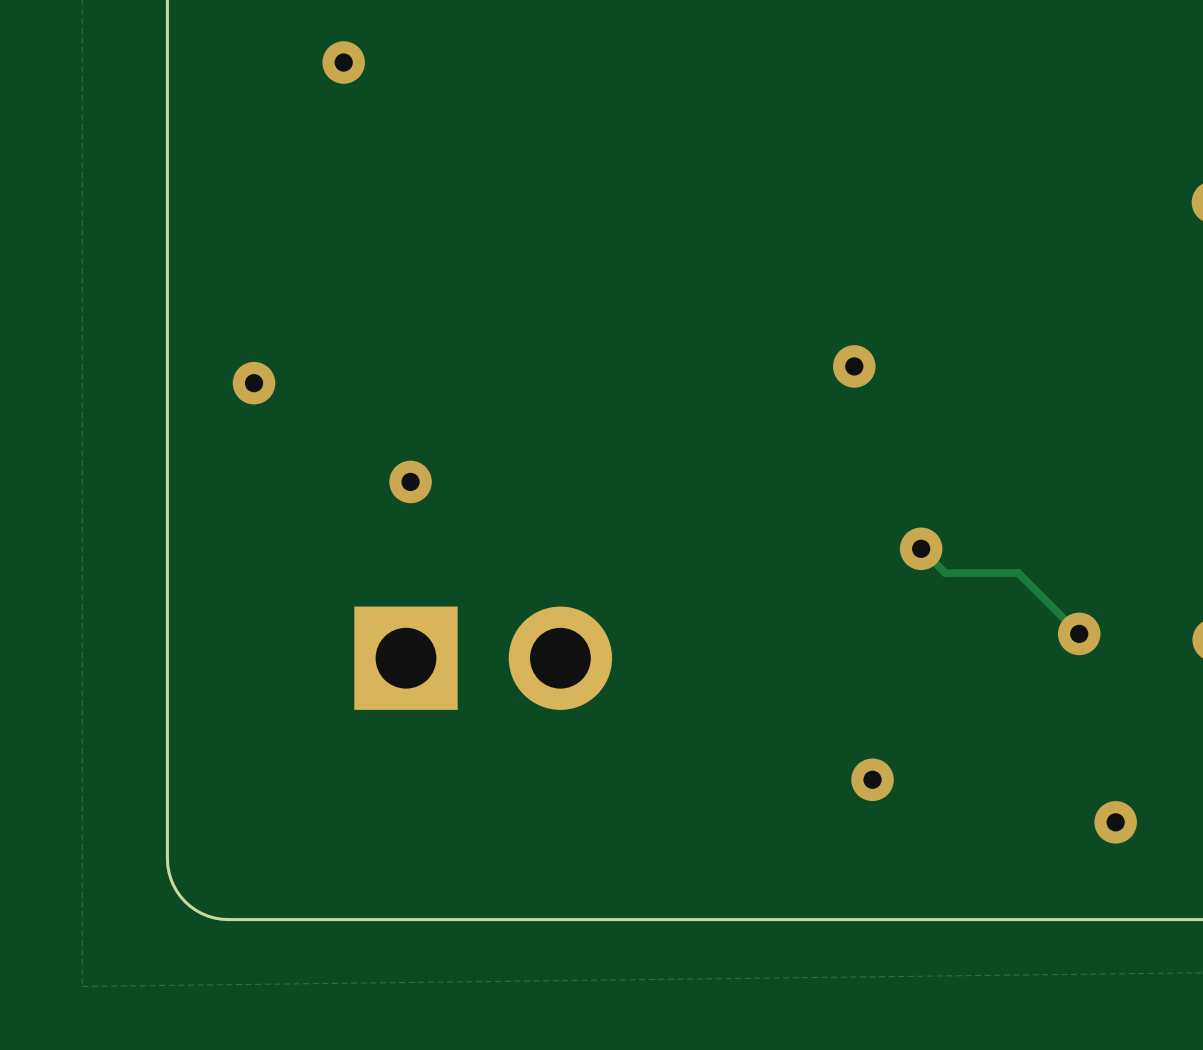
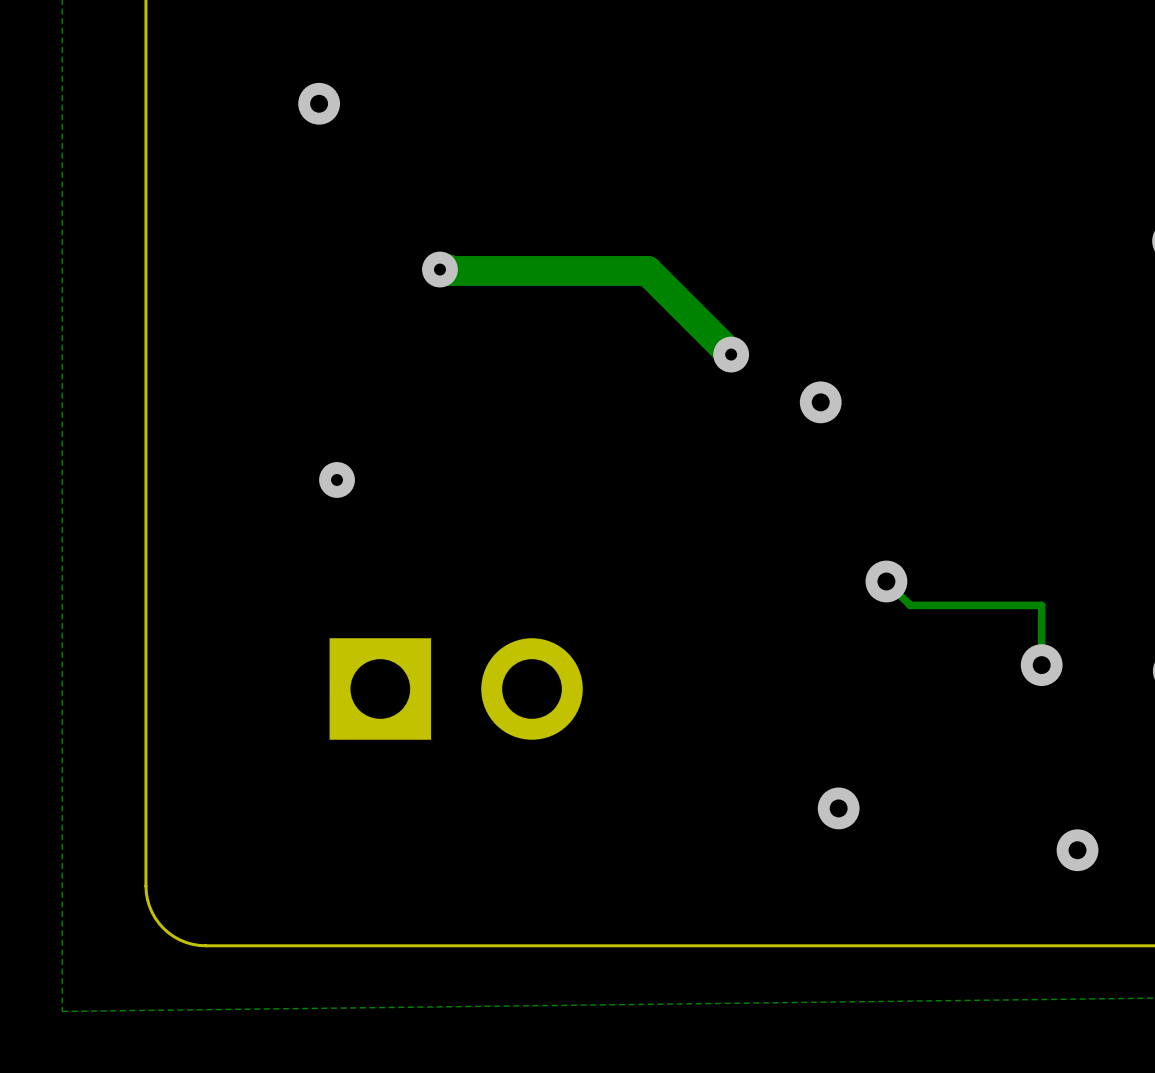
track: none -> (439, 269) (647, 270) (731, 354)
via: none -> (439, 269)
via: none -> (731, 354)
via: (254, 383) -> none
via: none -> (337, 479)
via: (410, 481) -> none
track: (1018, 573) (1079, 633) -> (981, 605) (1041, 605) (1041, 665)

